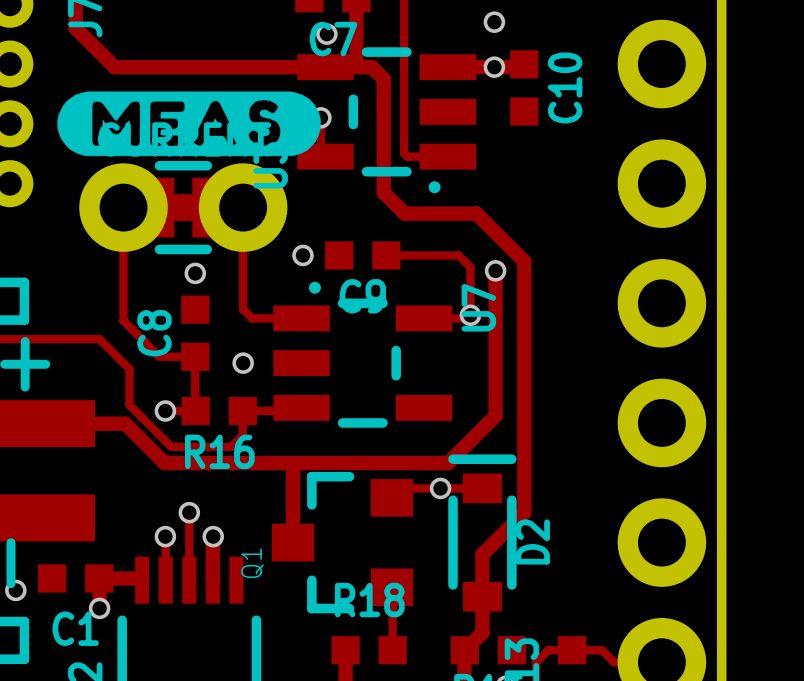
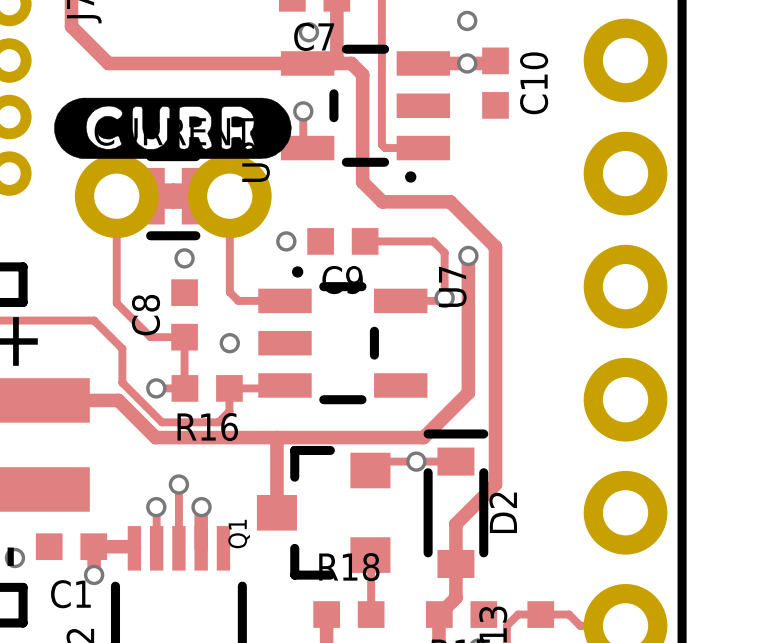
drawing shape: [57, 91, 321, 157] -> [54, 97, 292, 159]

